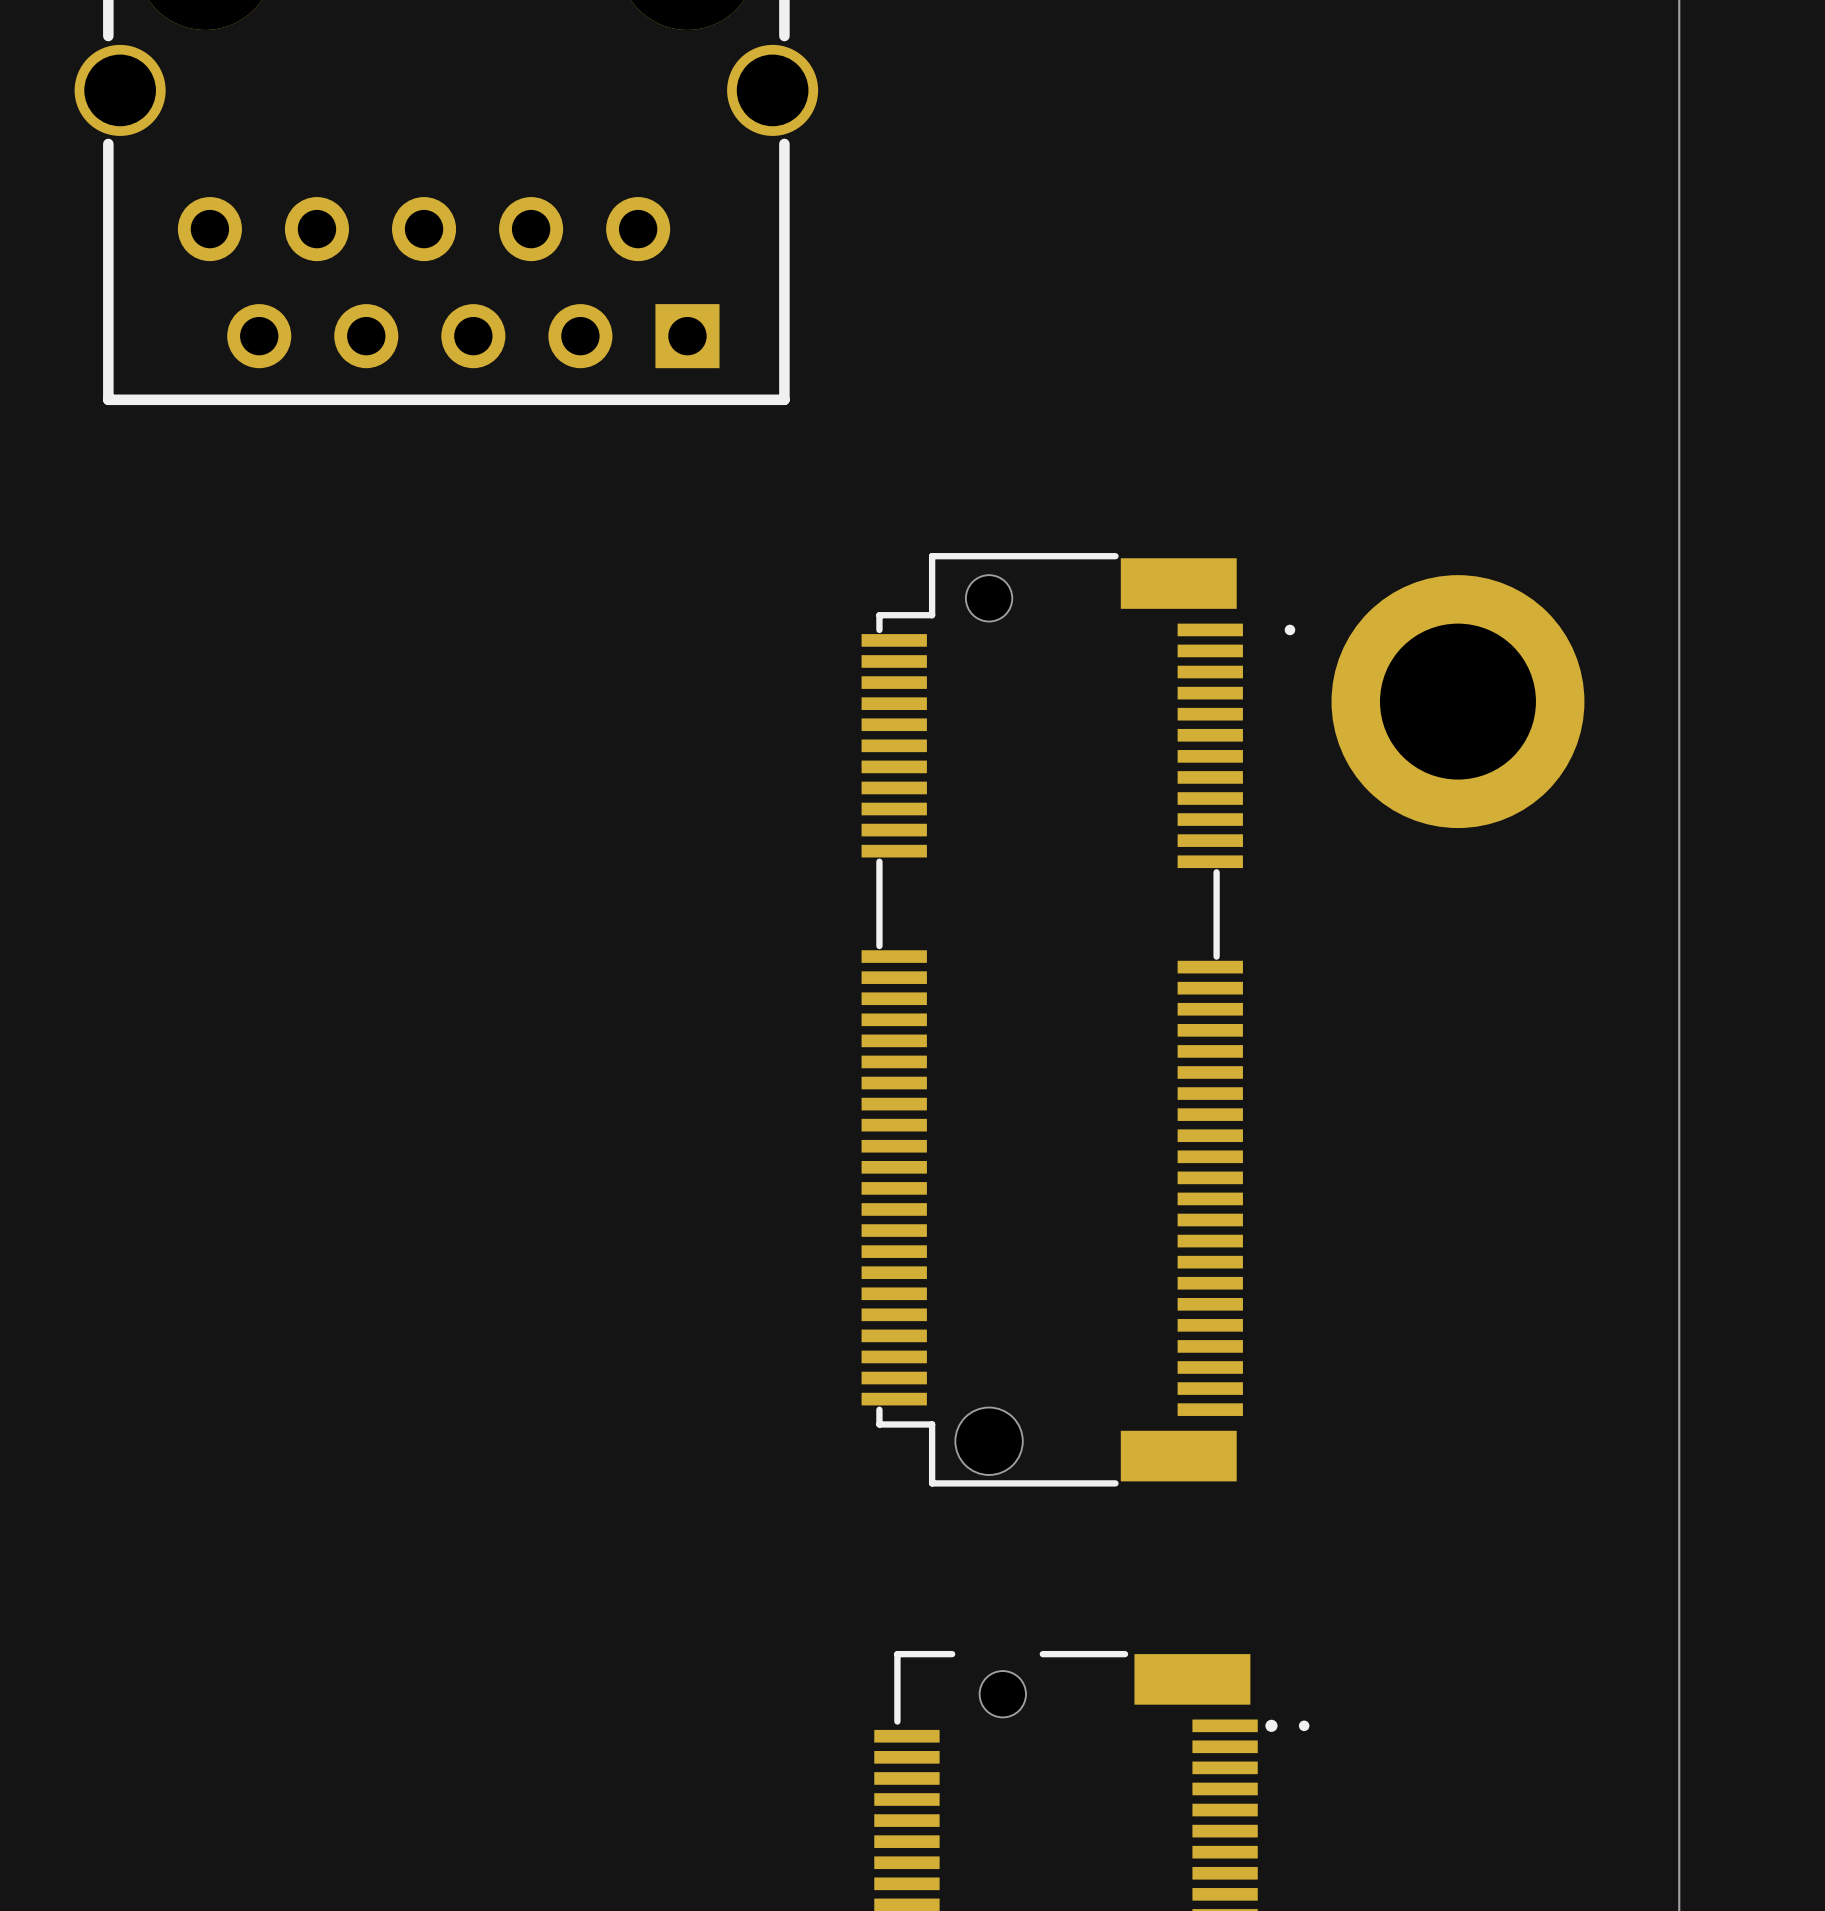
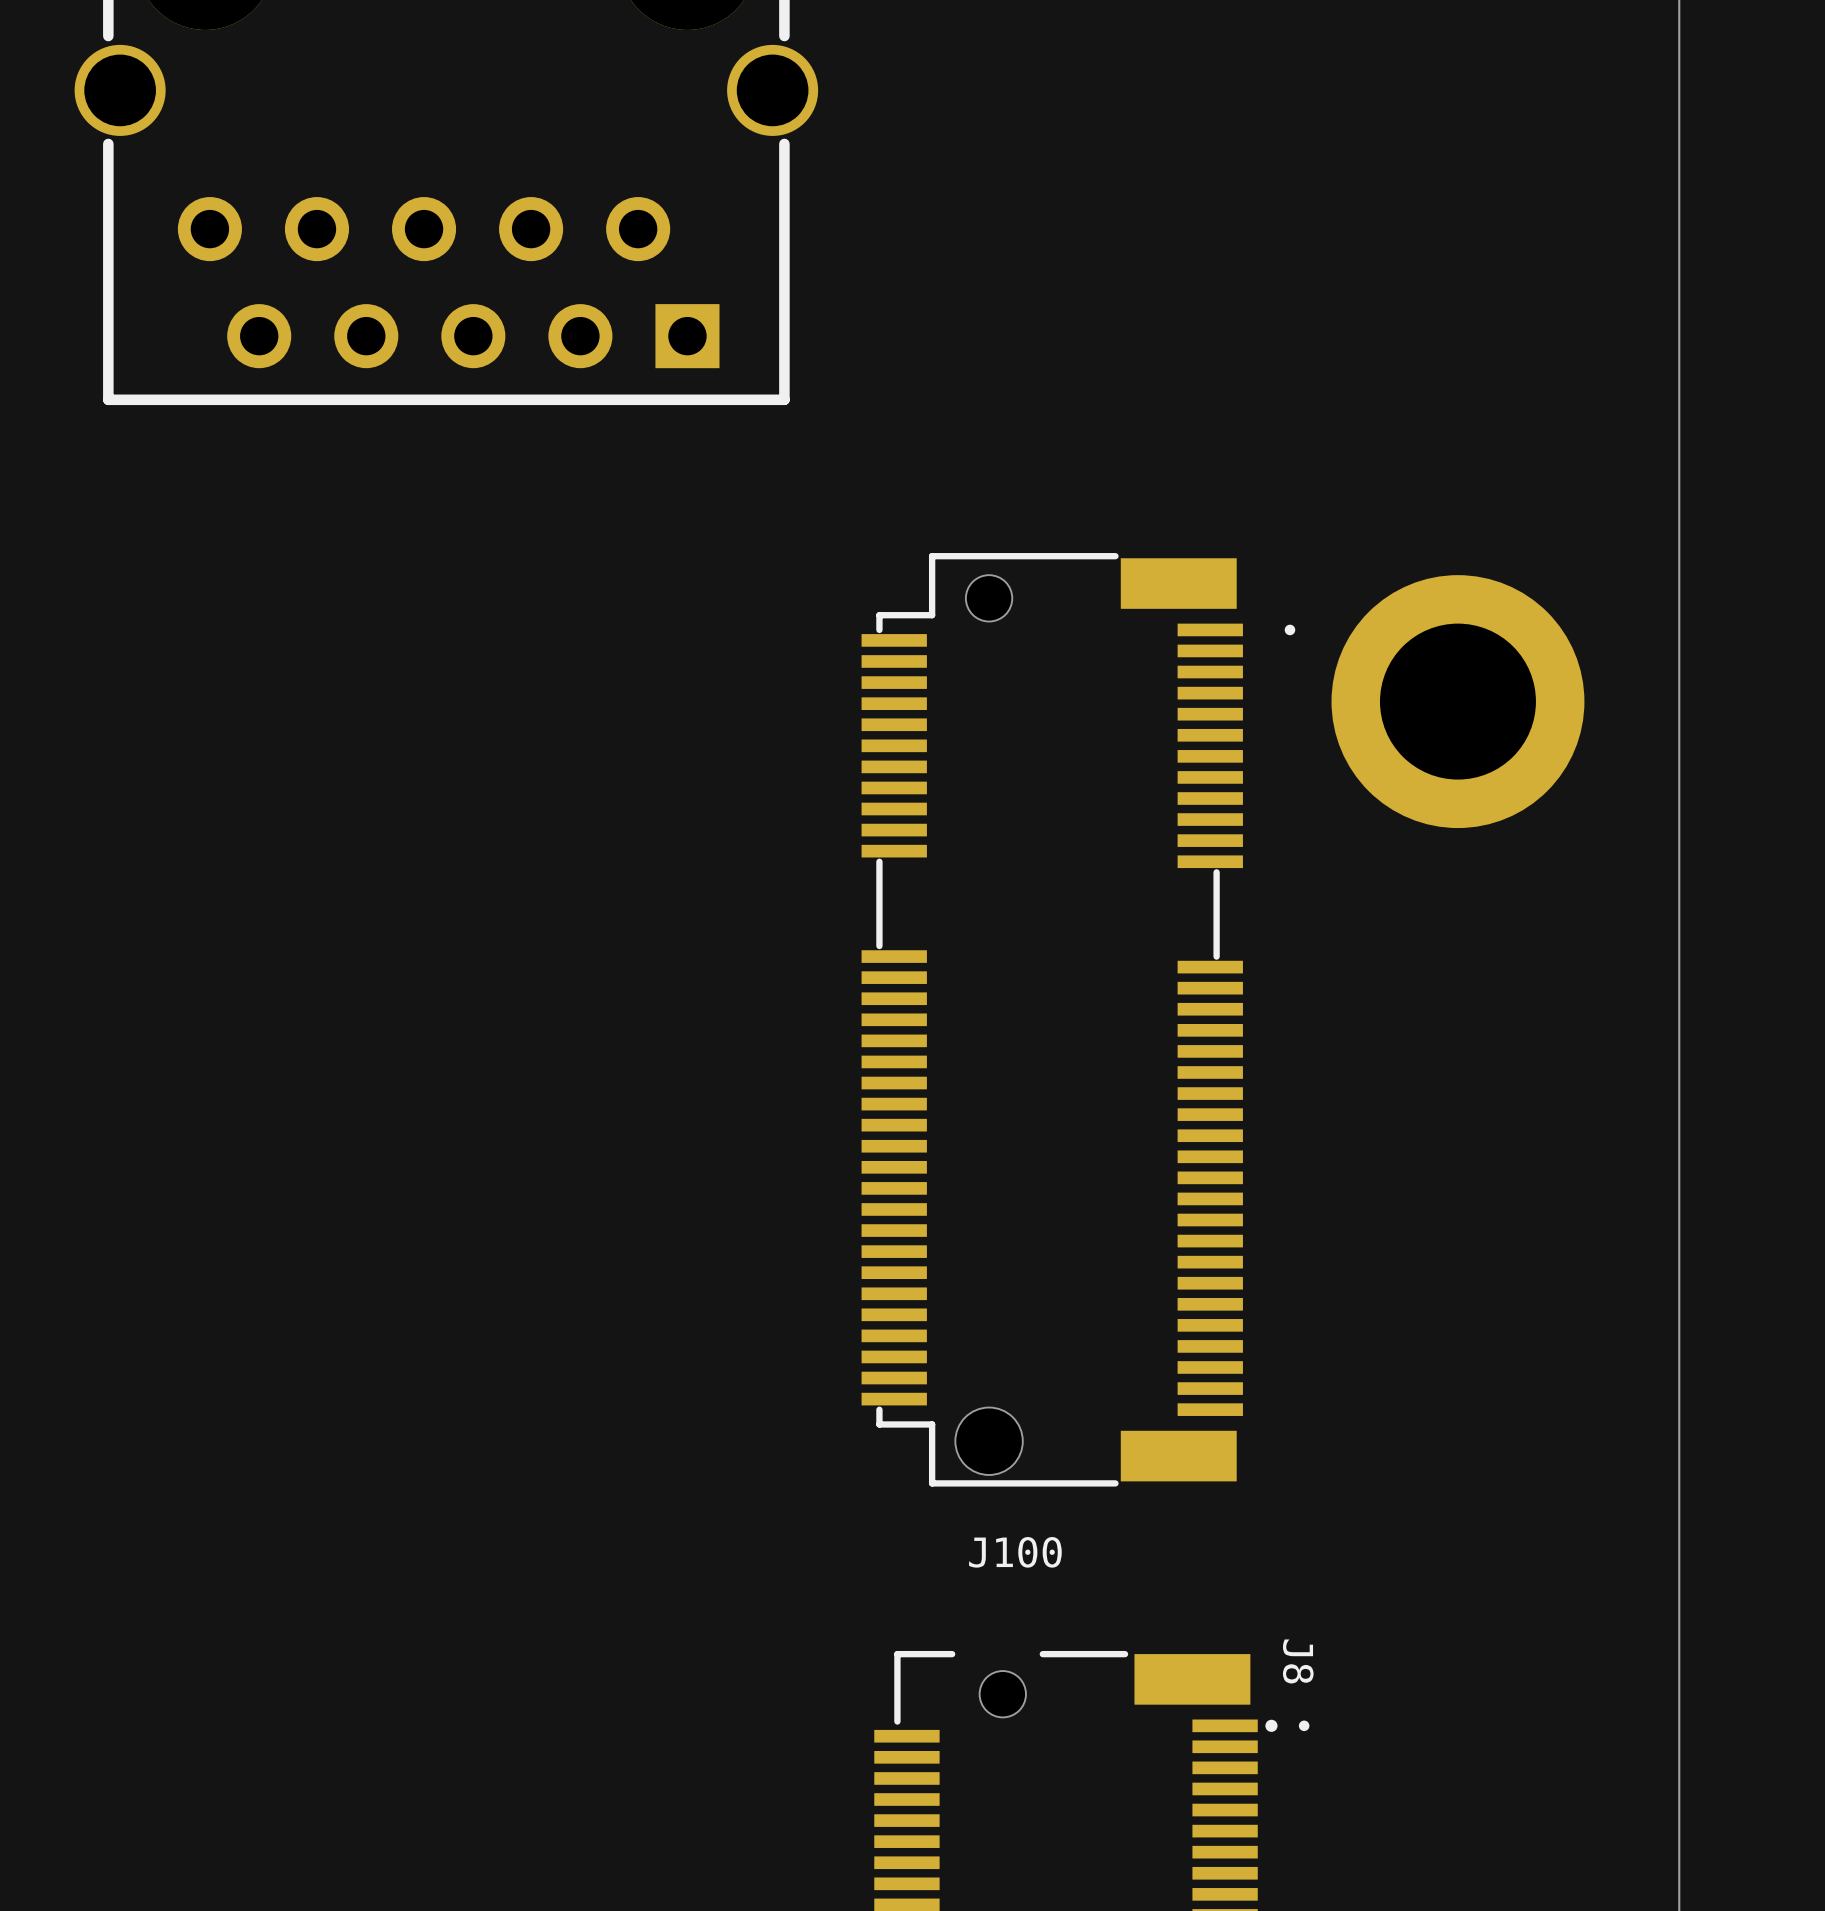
J100 name: none -> J100 (1015, 1552)
J8 name: none -> J8 (1298, 1661)

